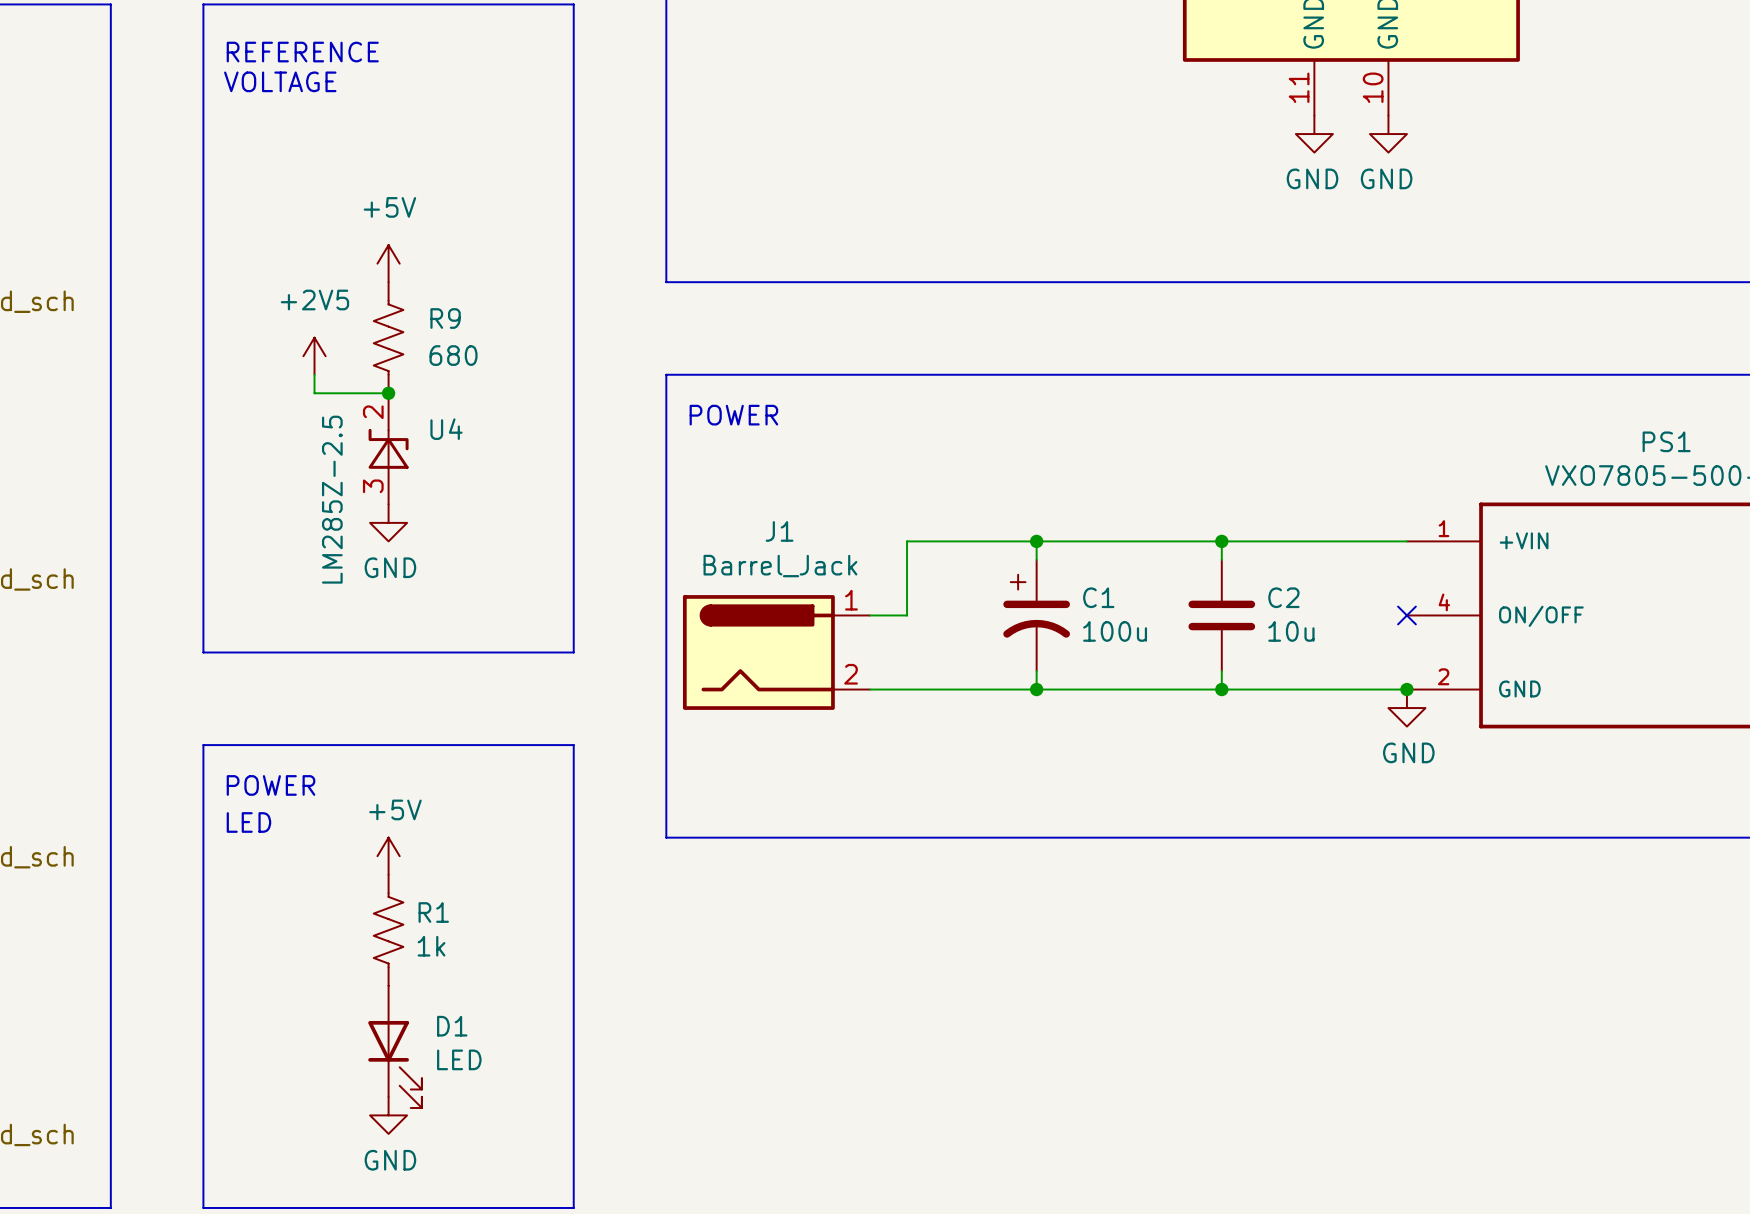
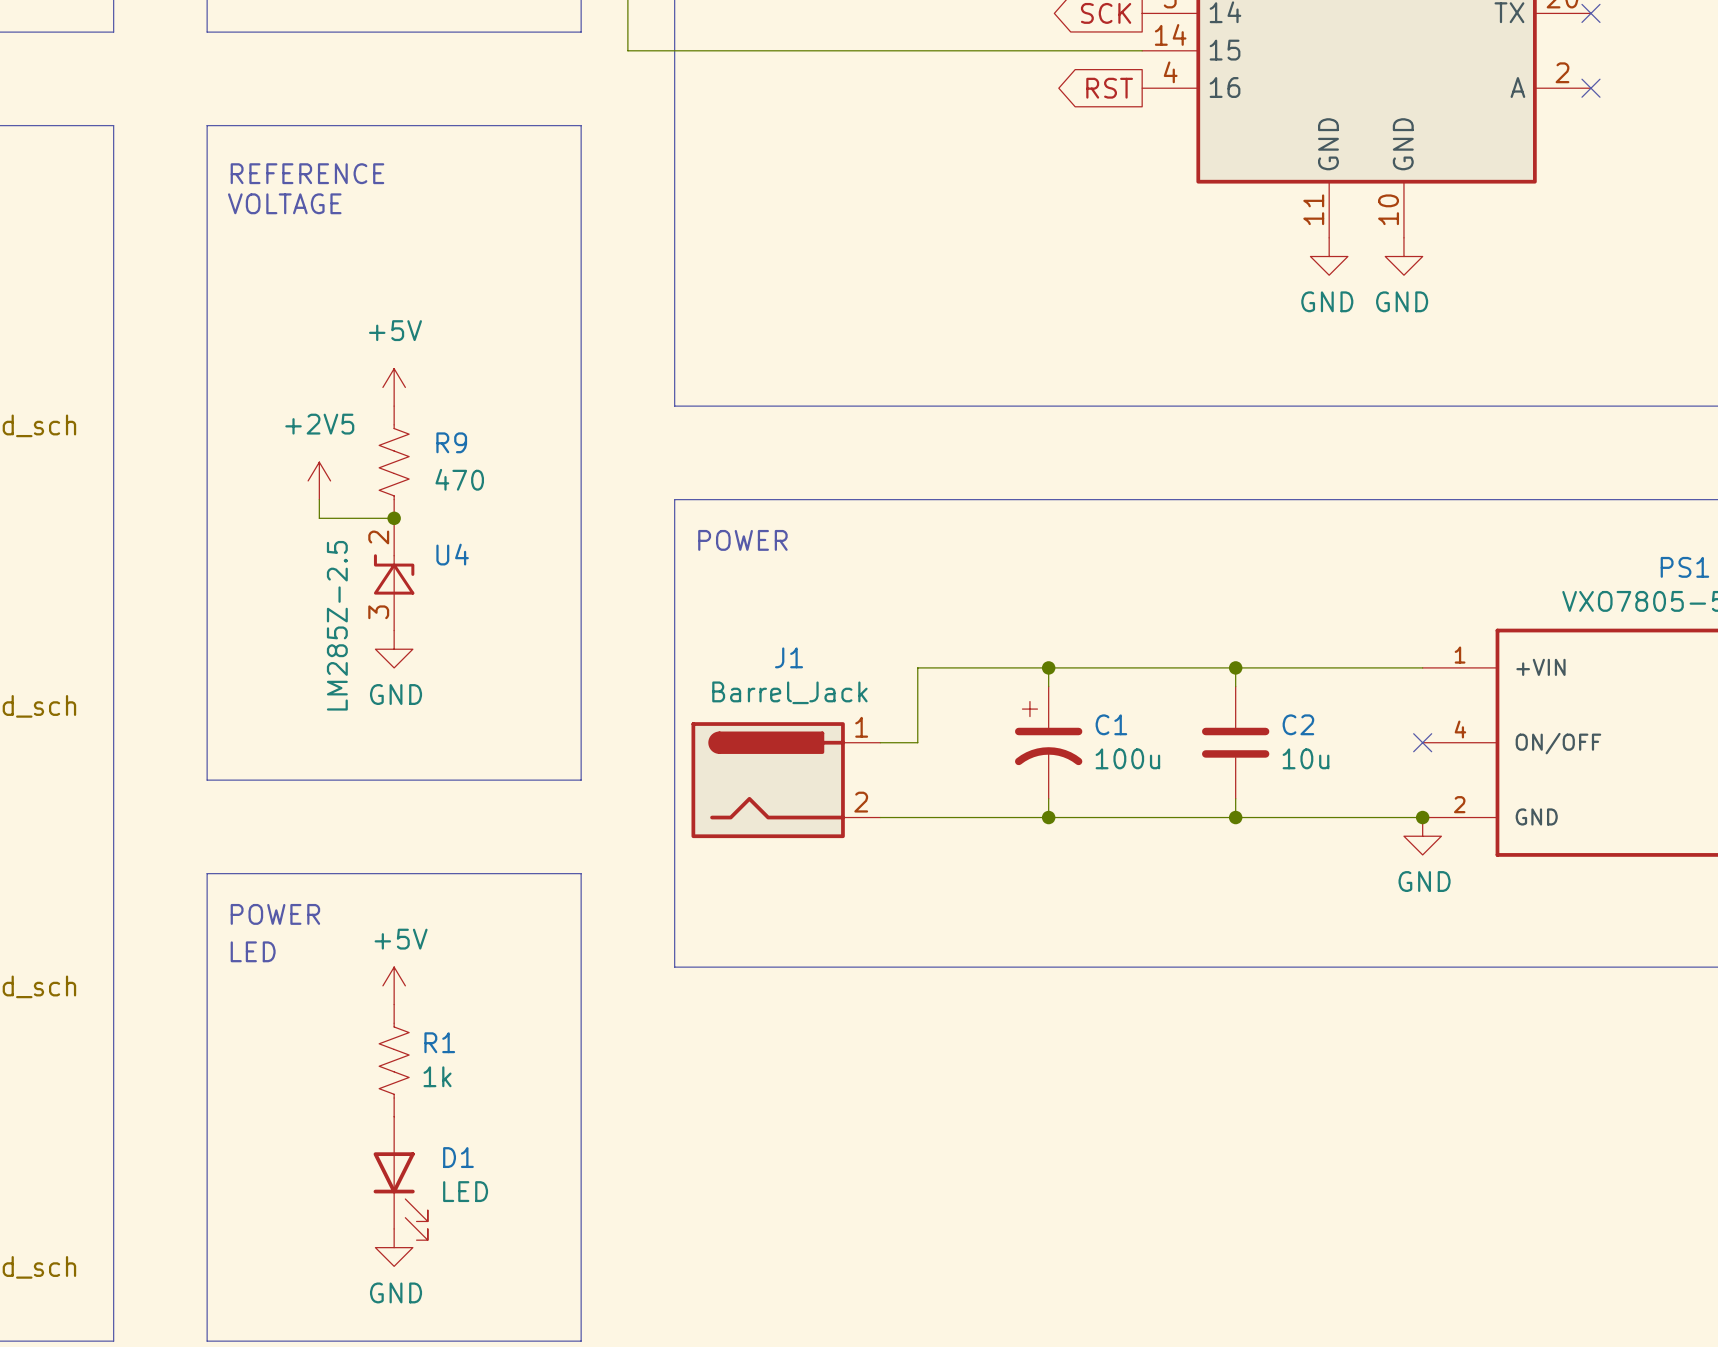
R9 value: 680 (453, 355) -> 470 (459, 479)

